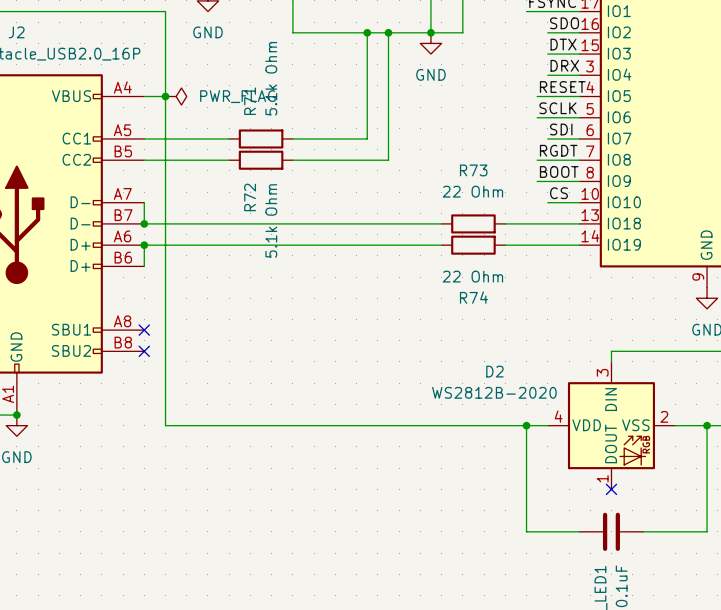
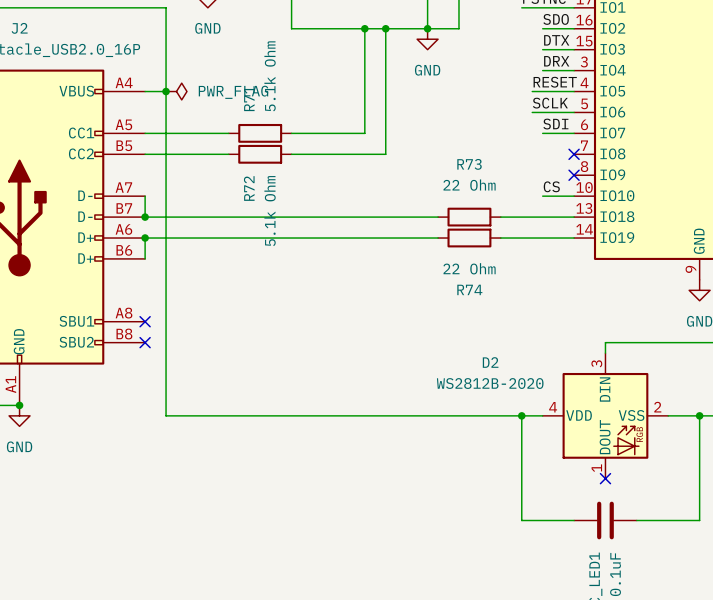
label: RGDT (558, 150) -> none
wire: (537, 160) (579, 160) -> none
no-connect mark: none -> (574, 154)
label: BOOT (559, 171) -> none
wire: (537, 181) (579, 181) -> none
no-connect mark: none -> (574, 175)

